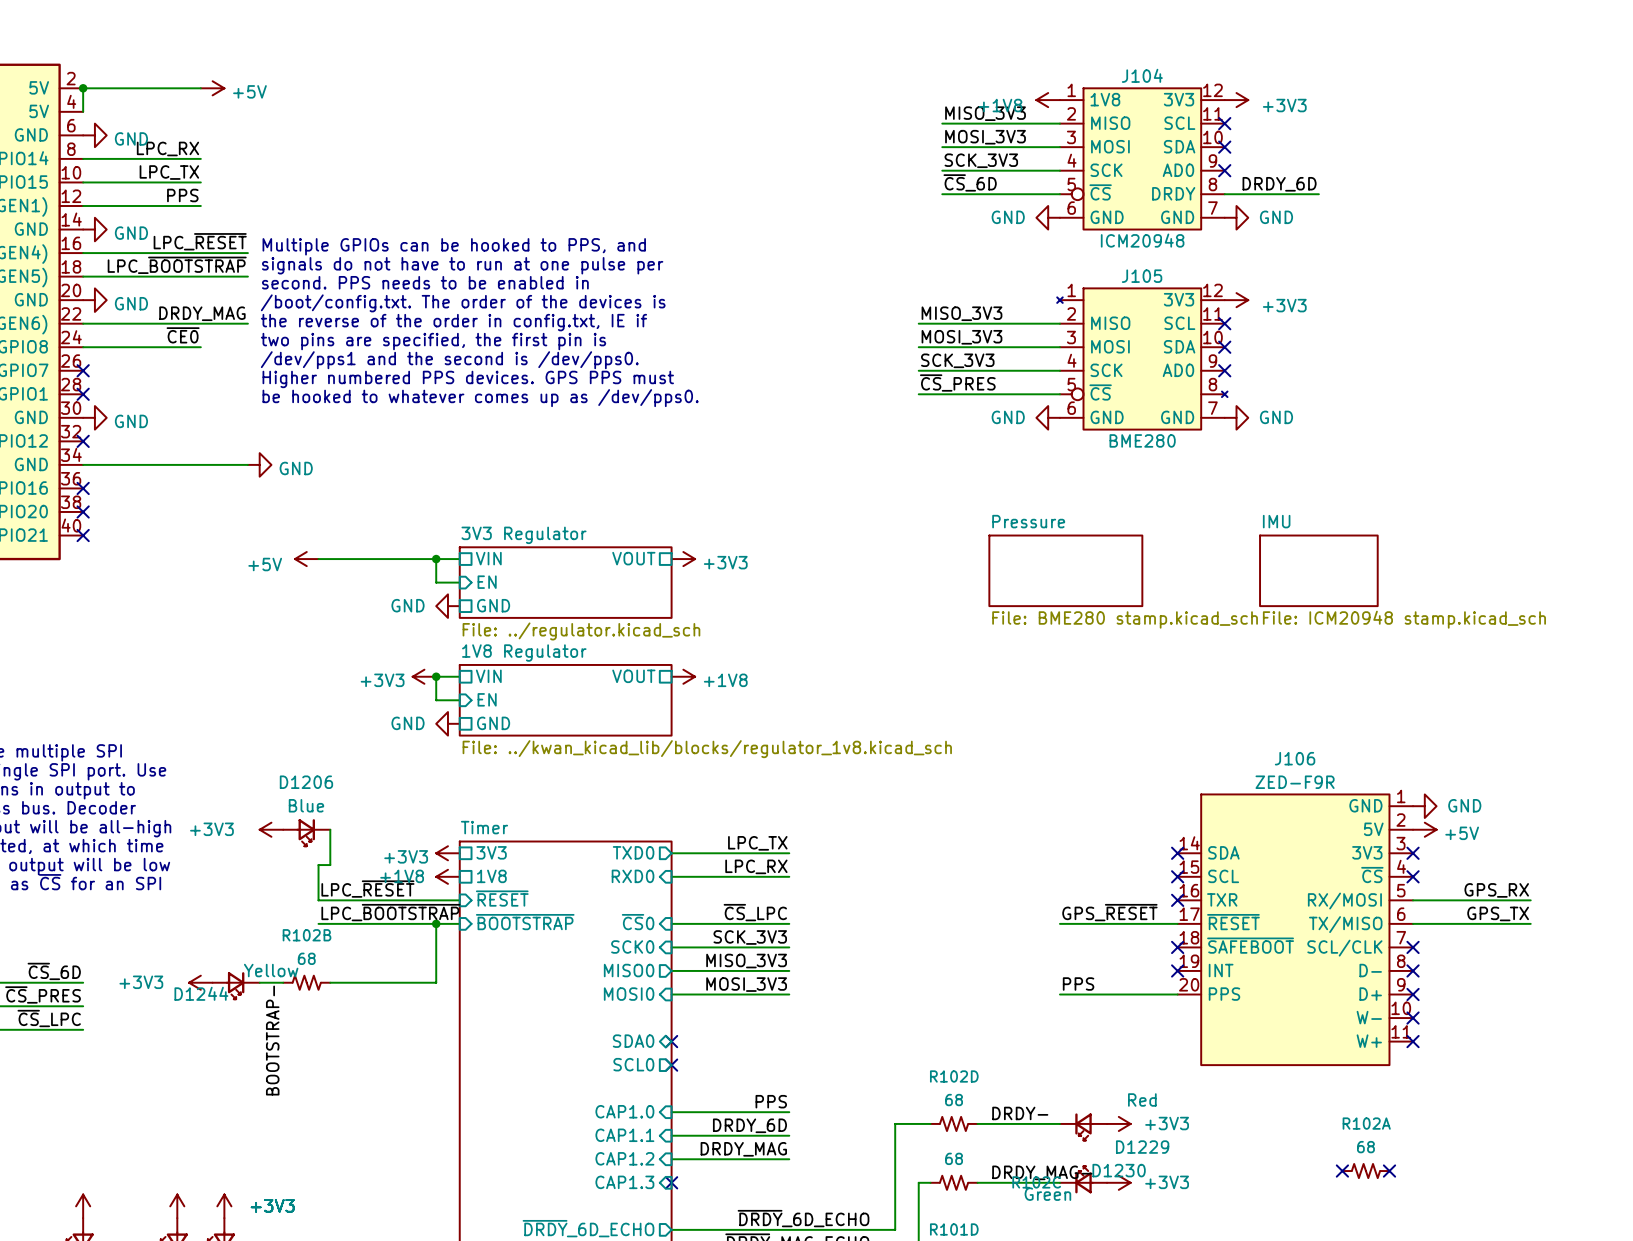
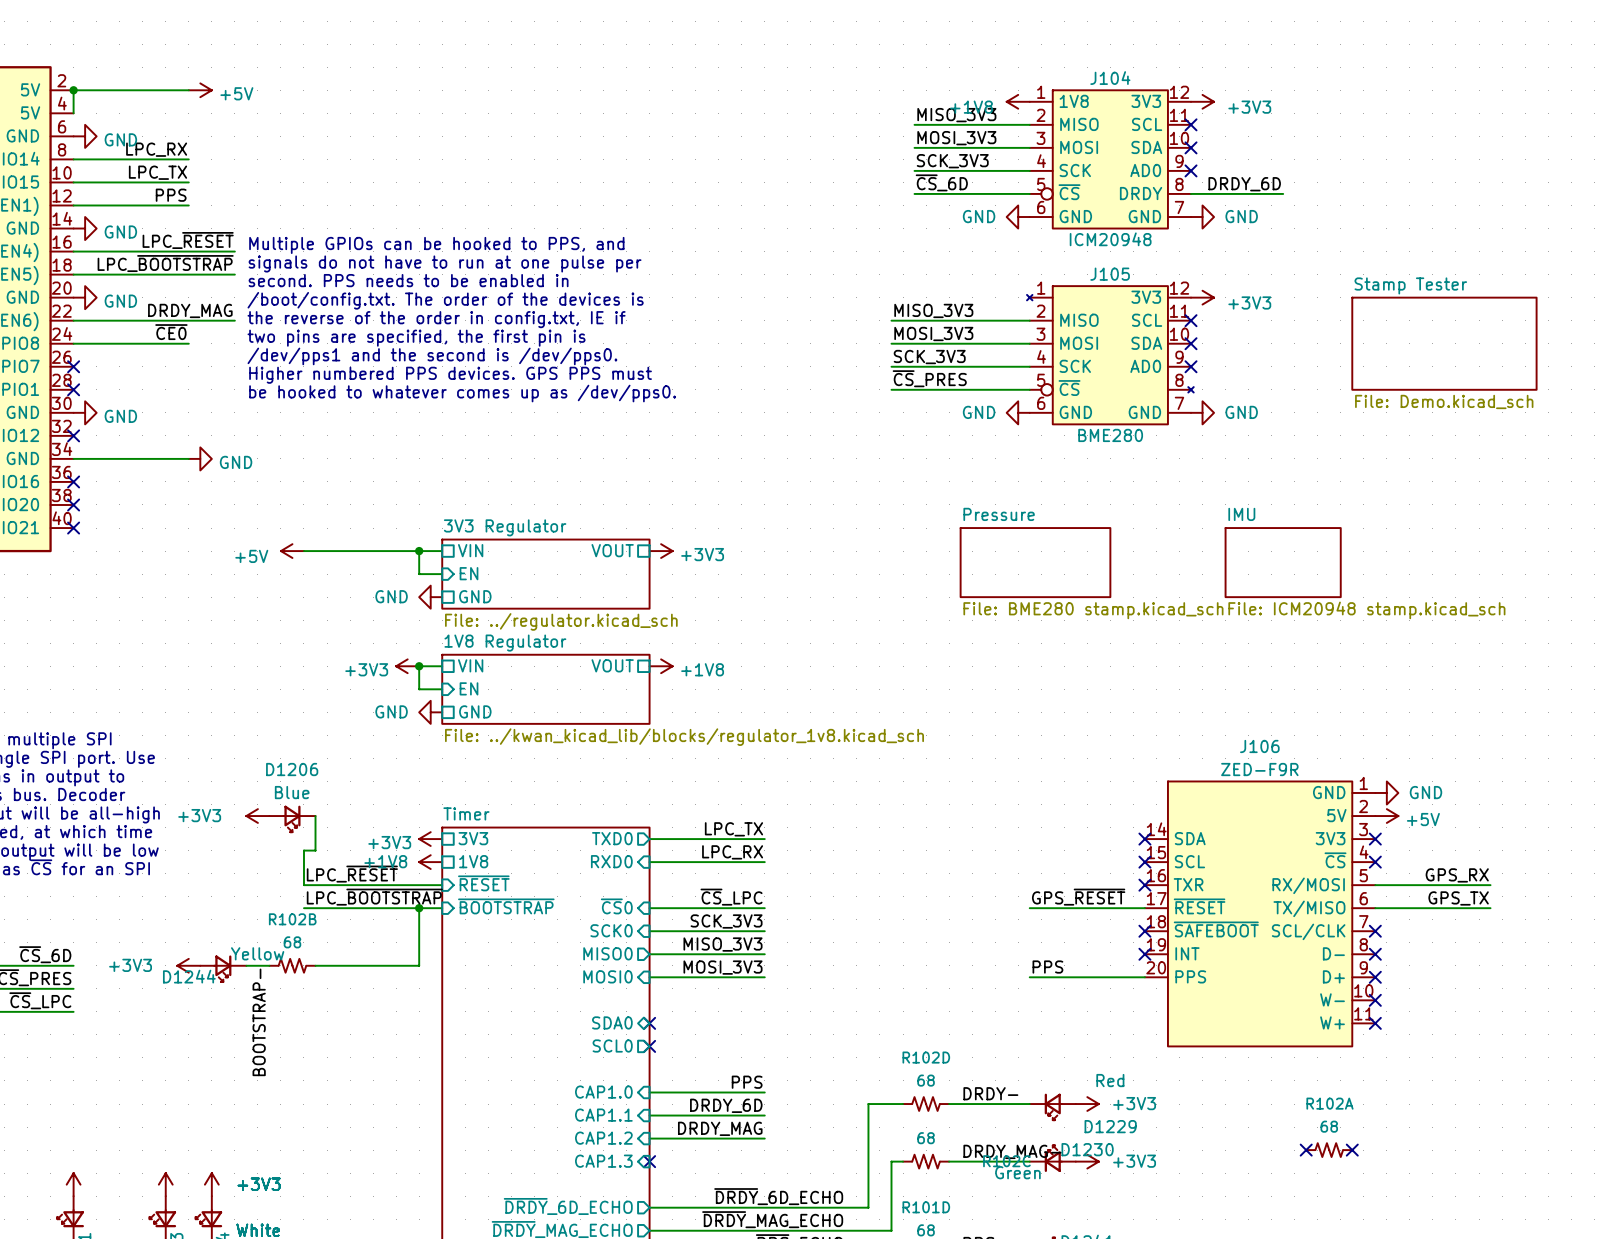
sheet Stamp Tester: none -> File: Demo.kicad_sch (1444, 343)
wire: (200, 464) (247, 464) -> none
power symbol position: GND (259, 464) -> GND (200, 458)

